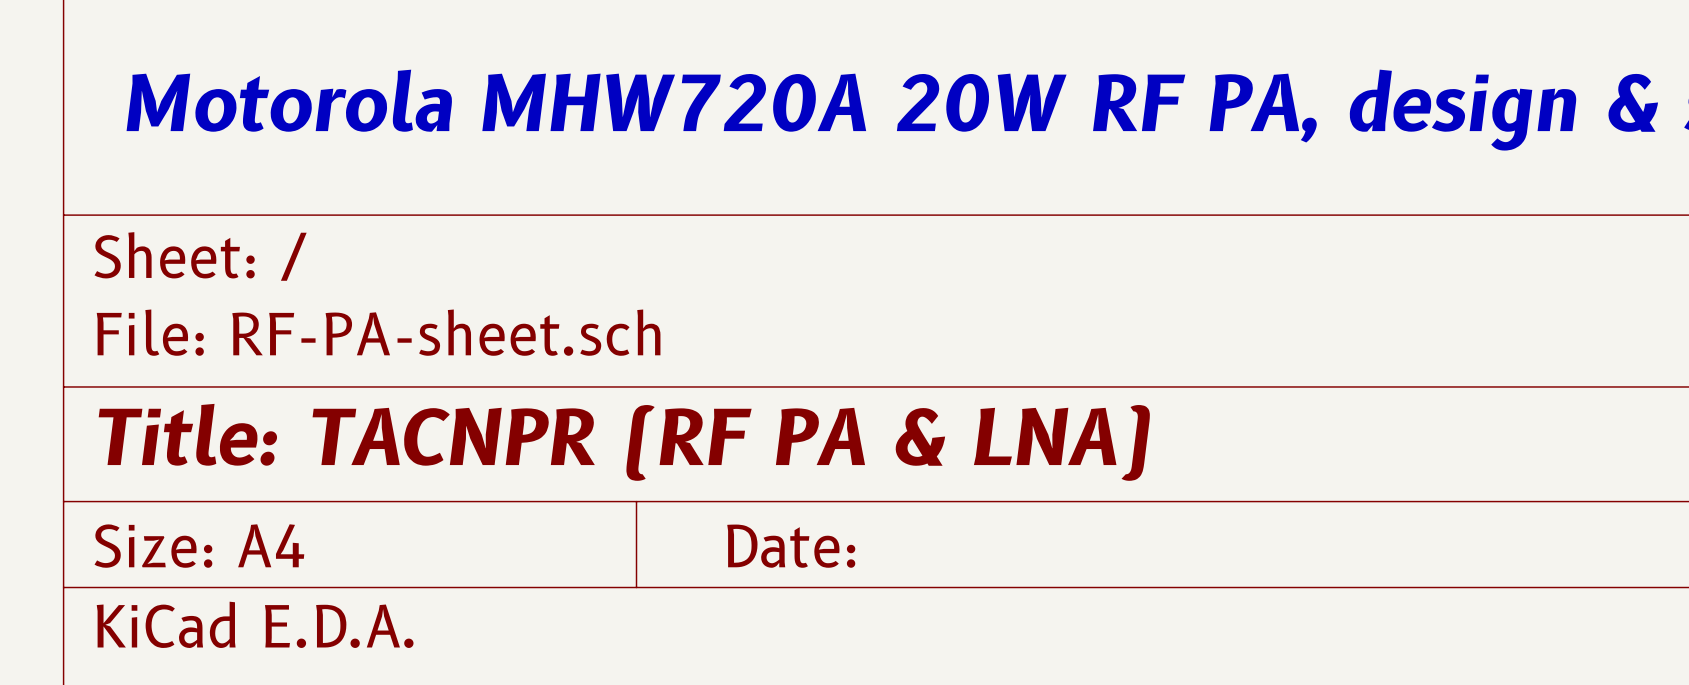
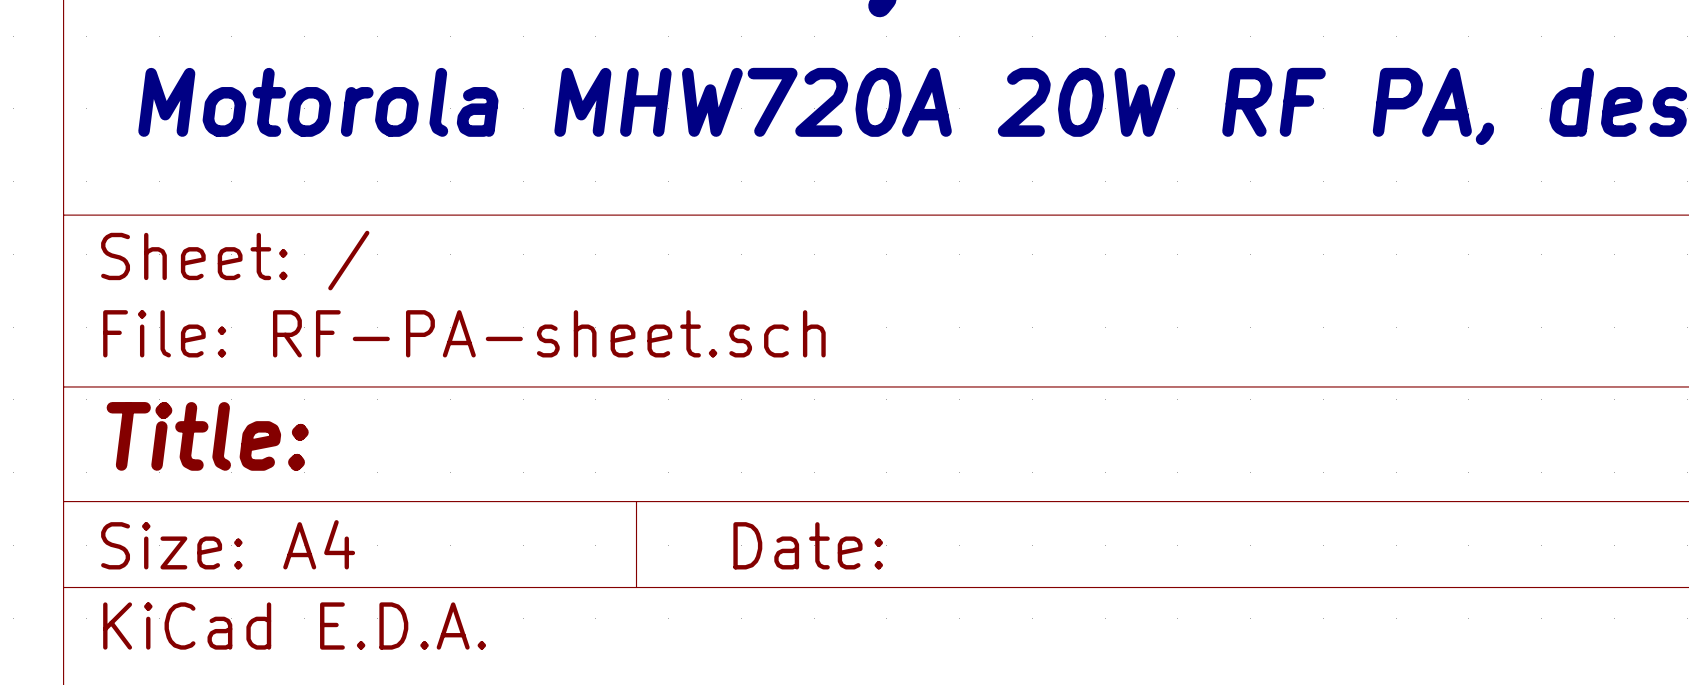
title block: Title: TACNPR (RF PA & LNA) (624, 442) -> Title: (207, 436)

